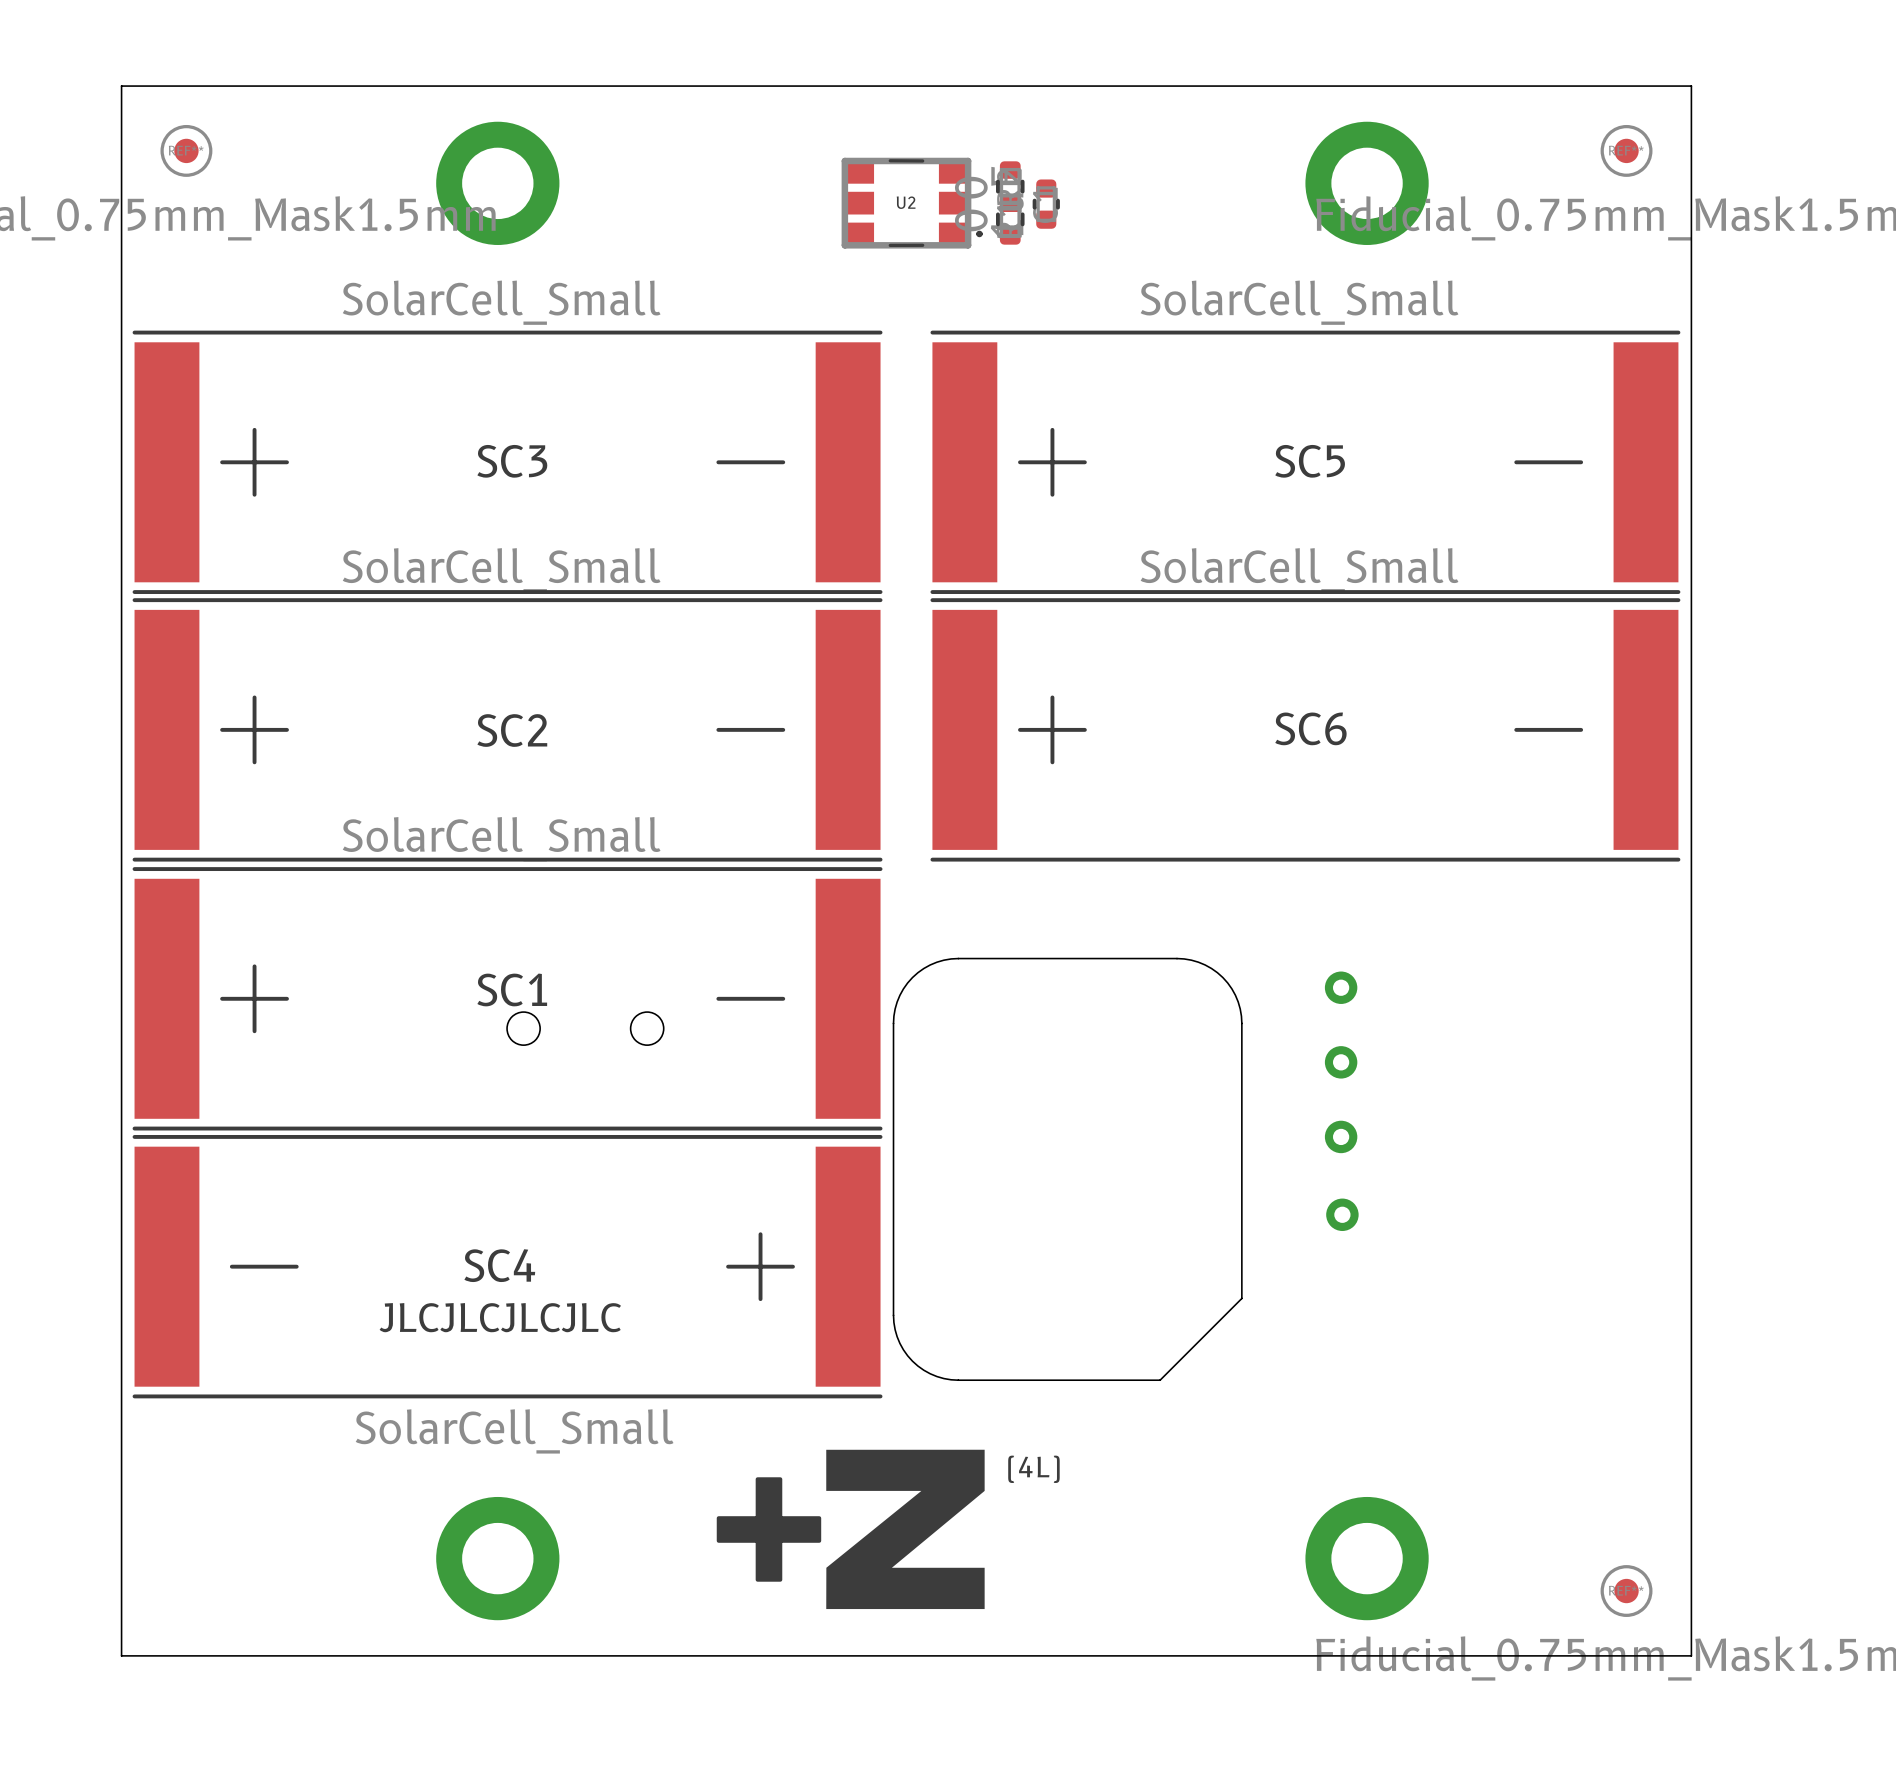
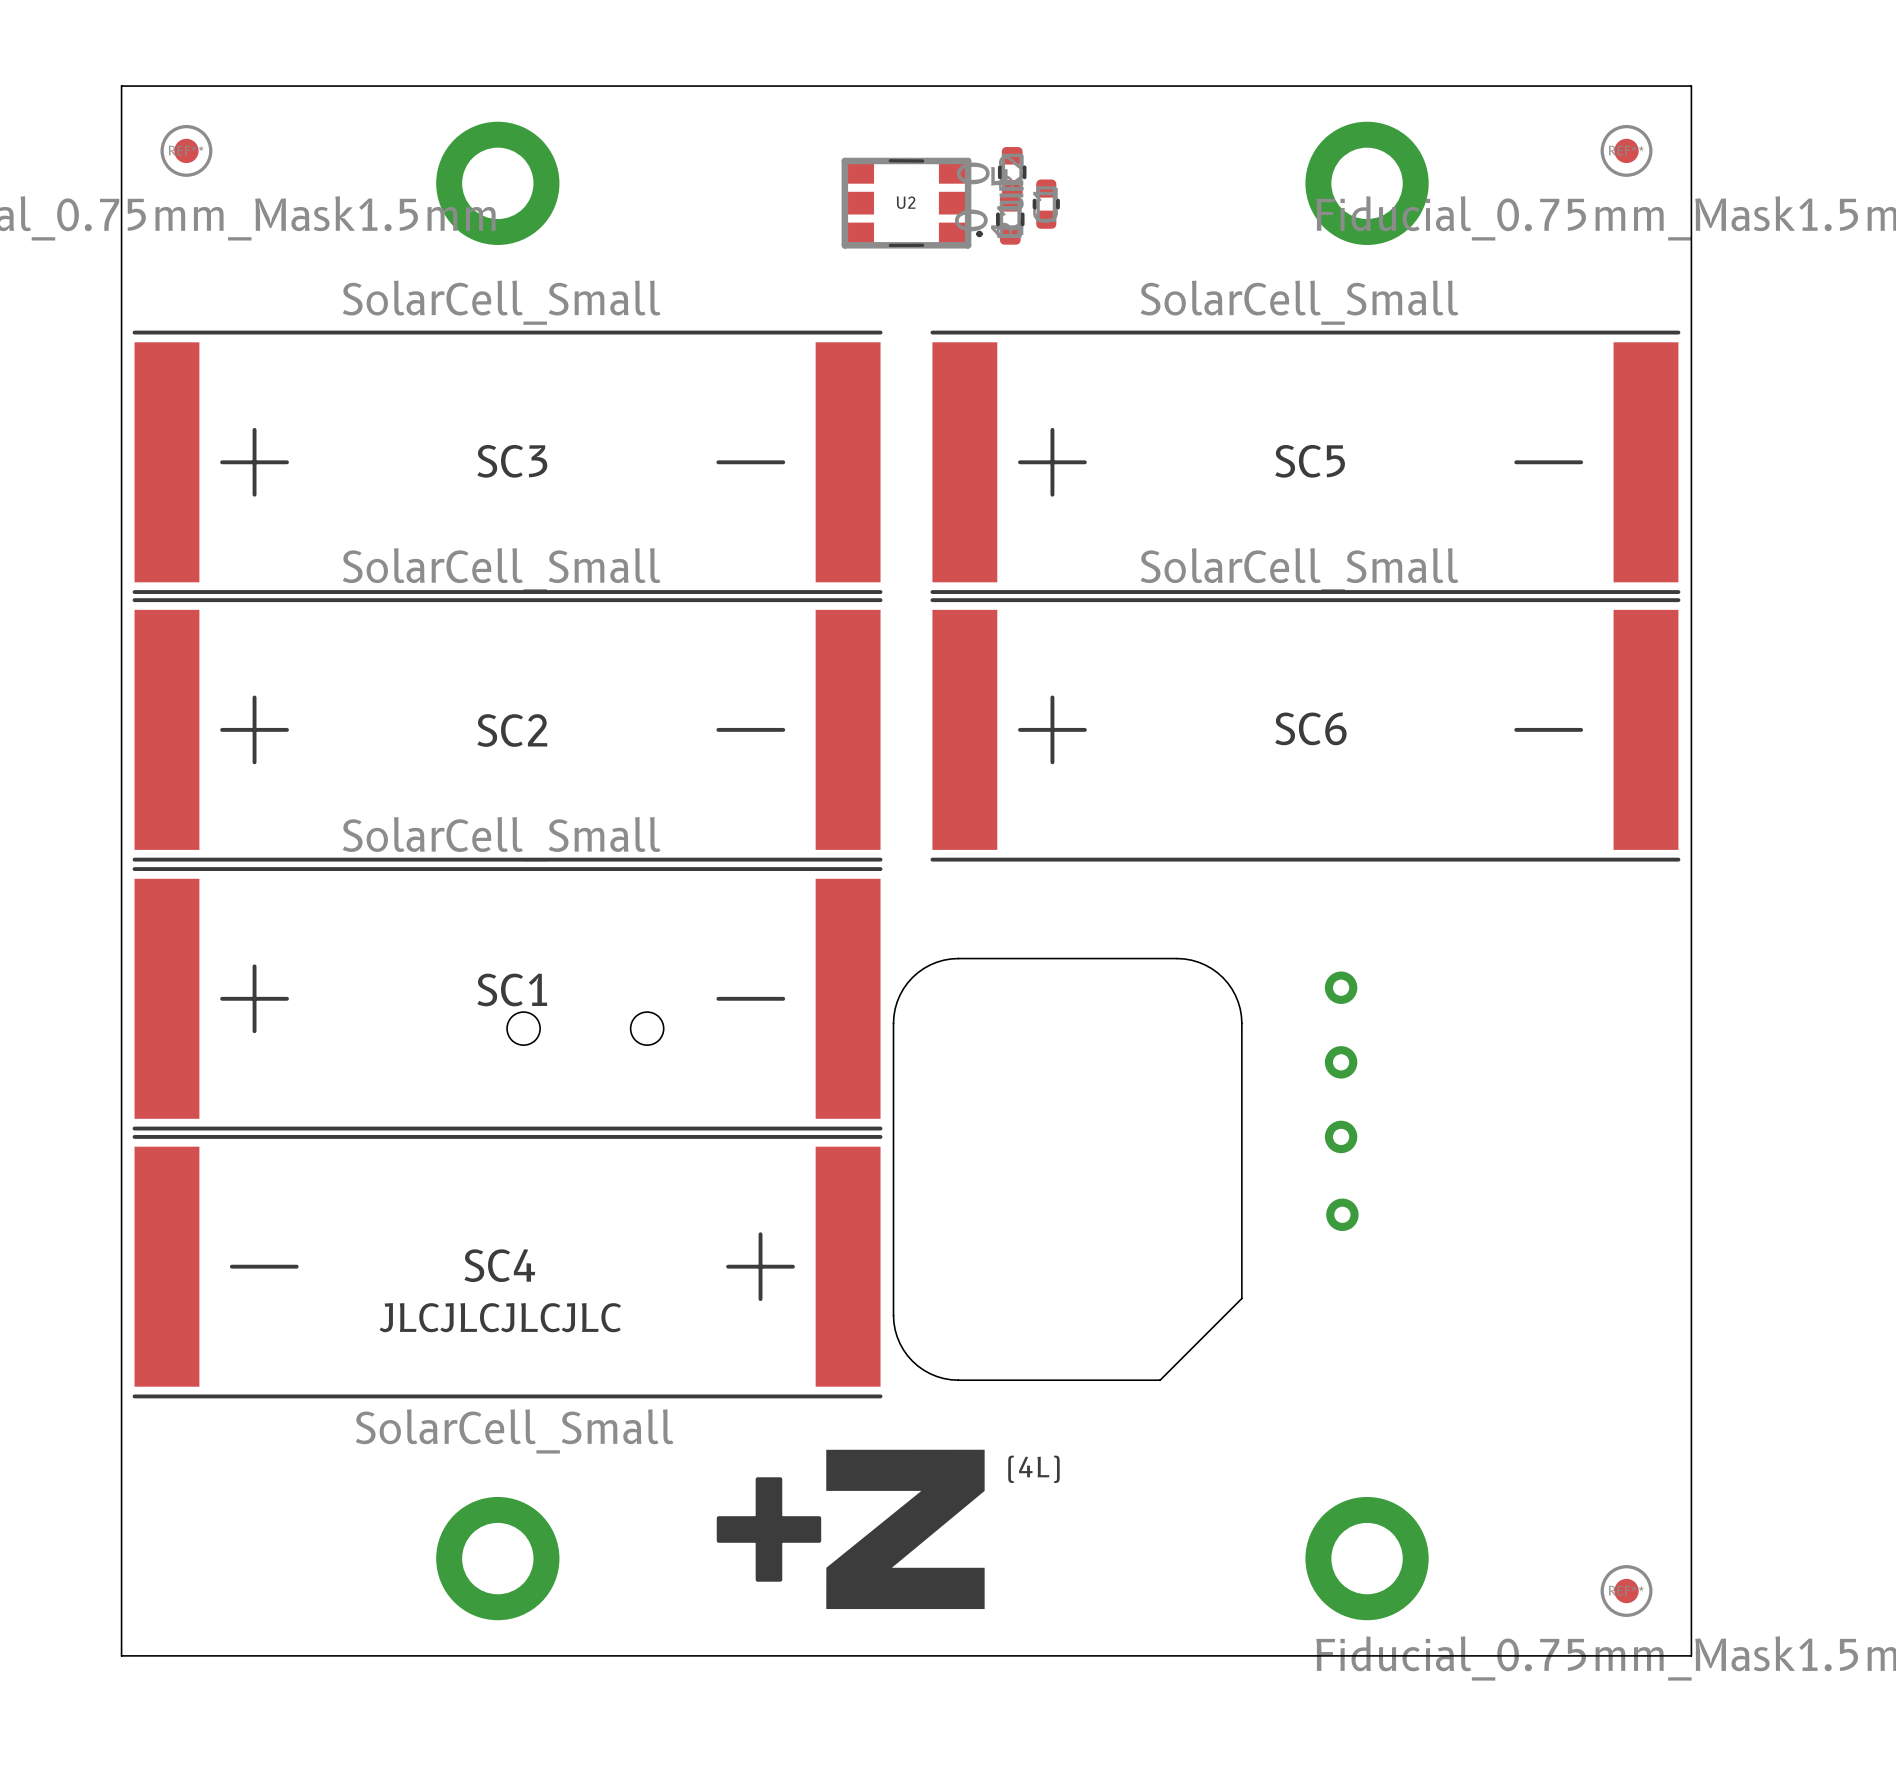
part position: (1010, 186) -> (1012, 172)

